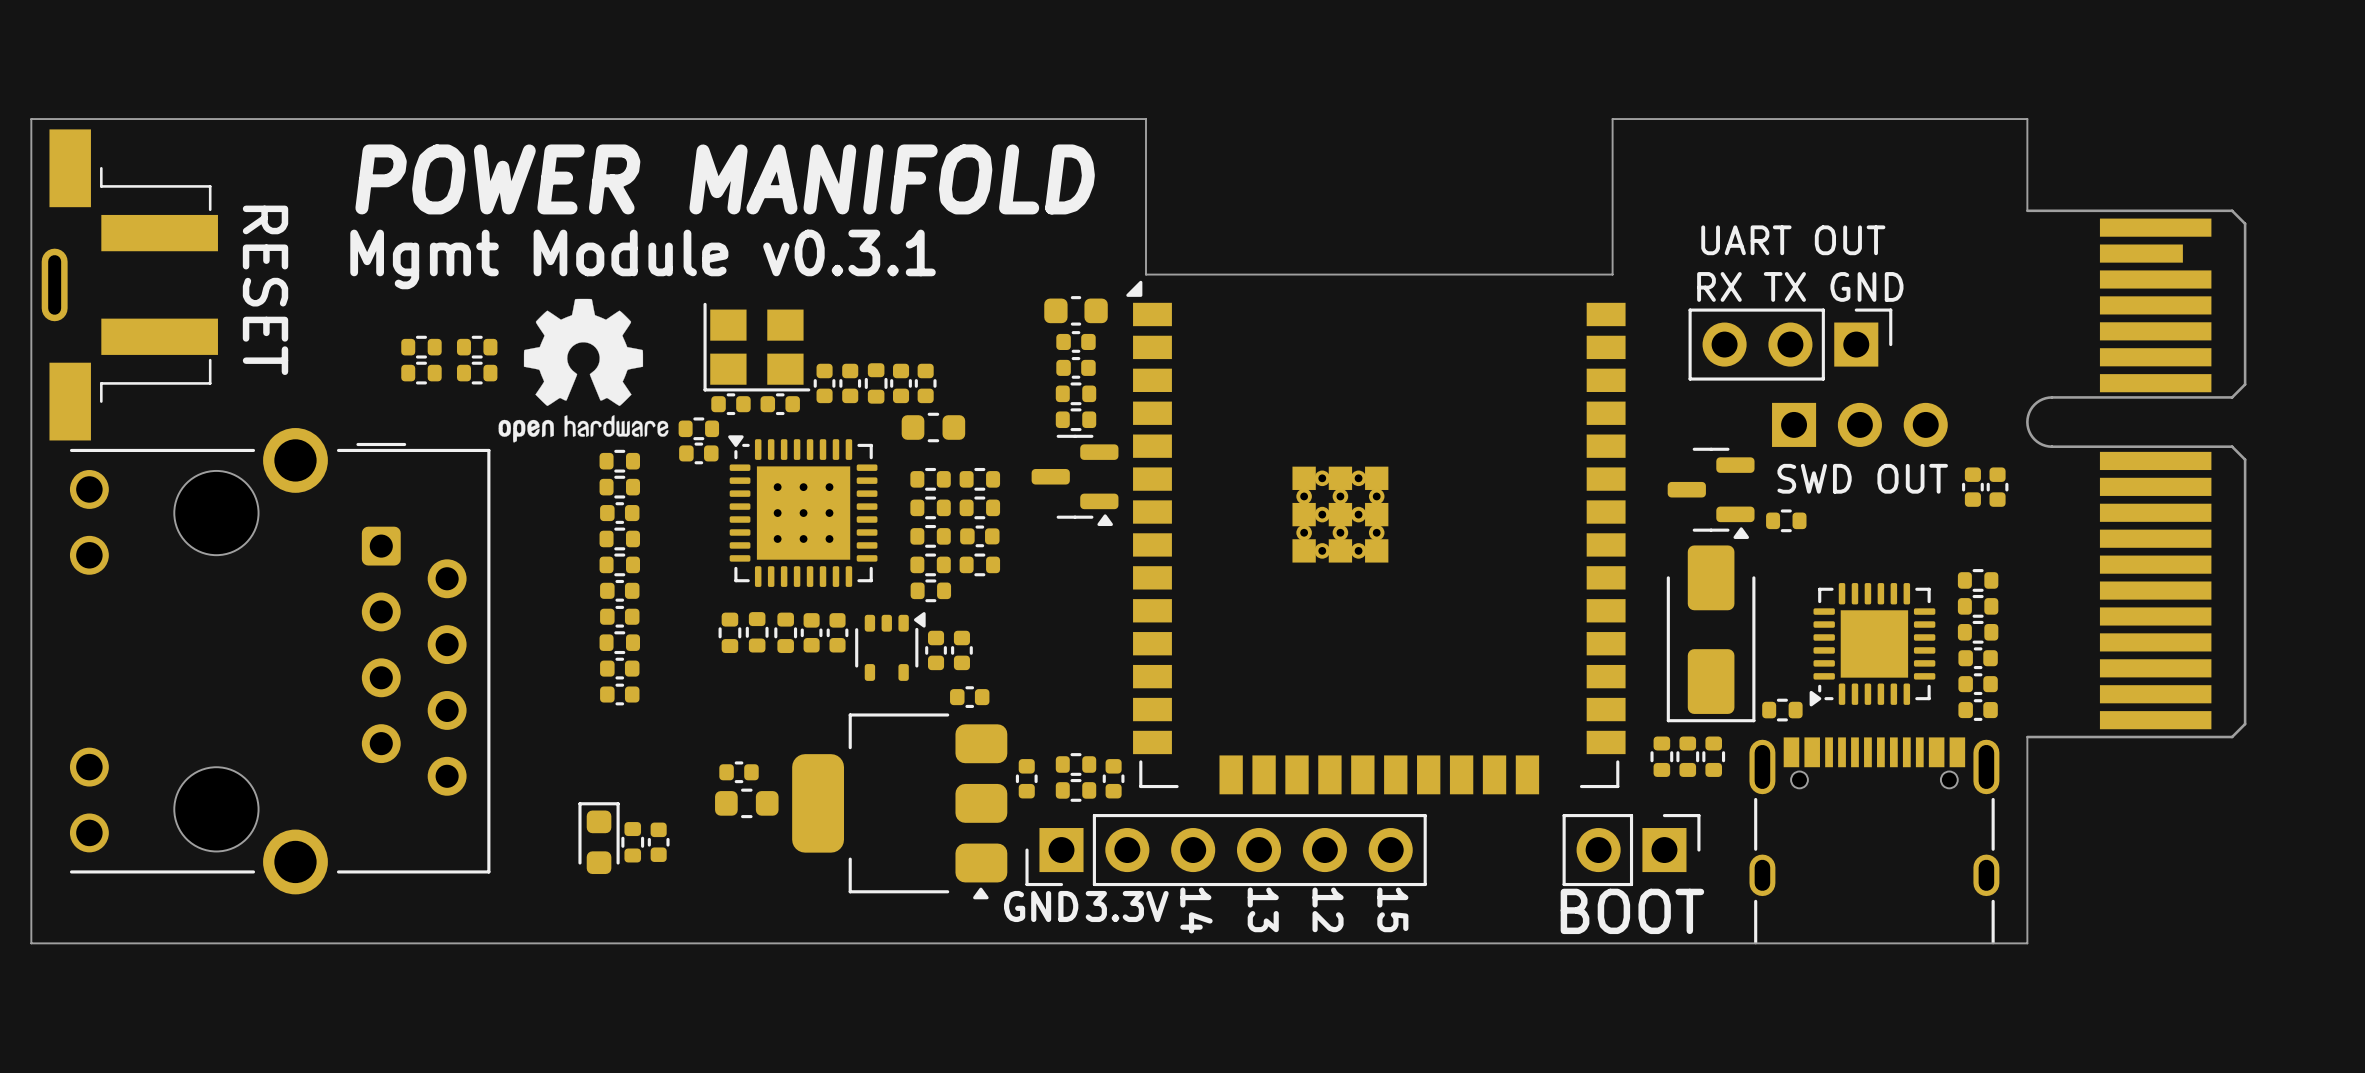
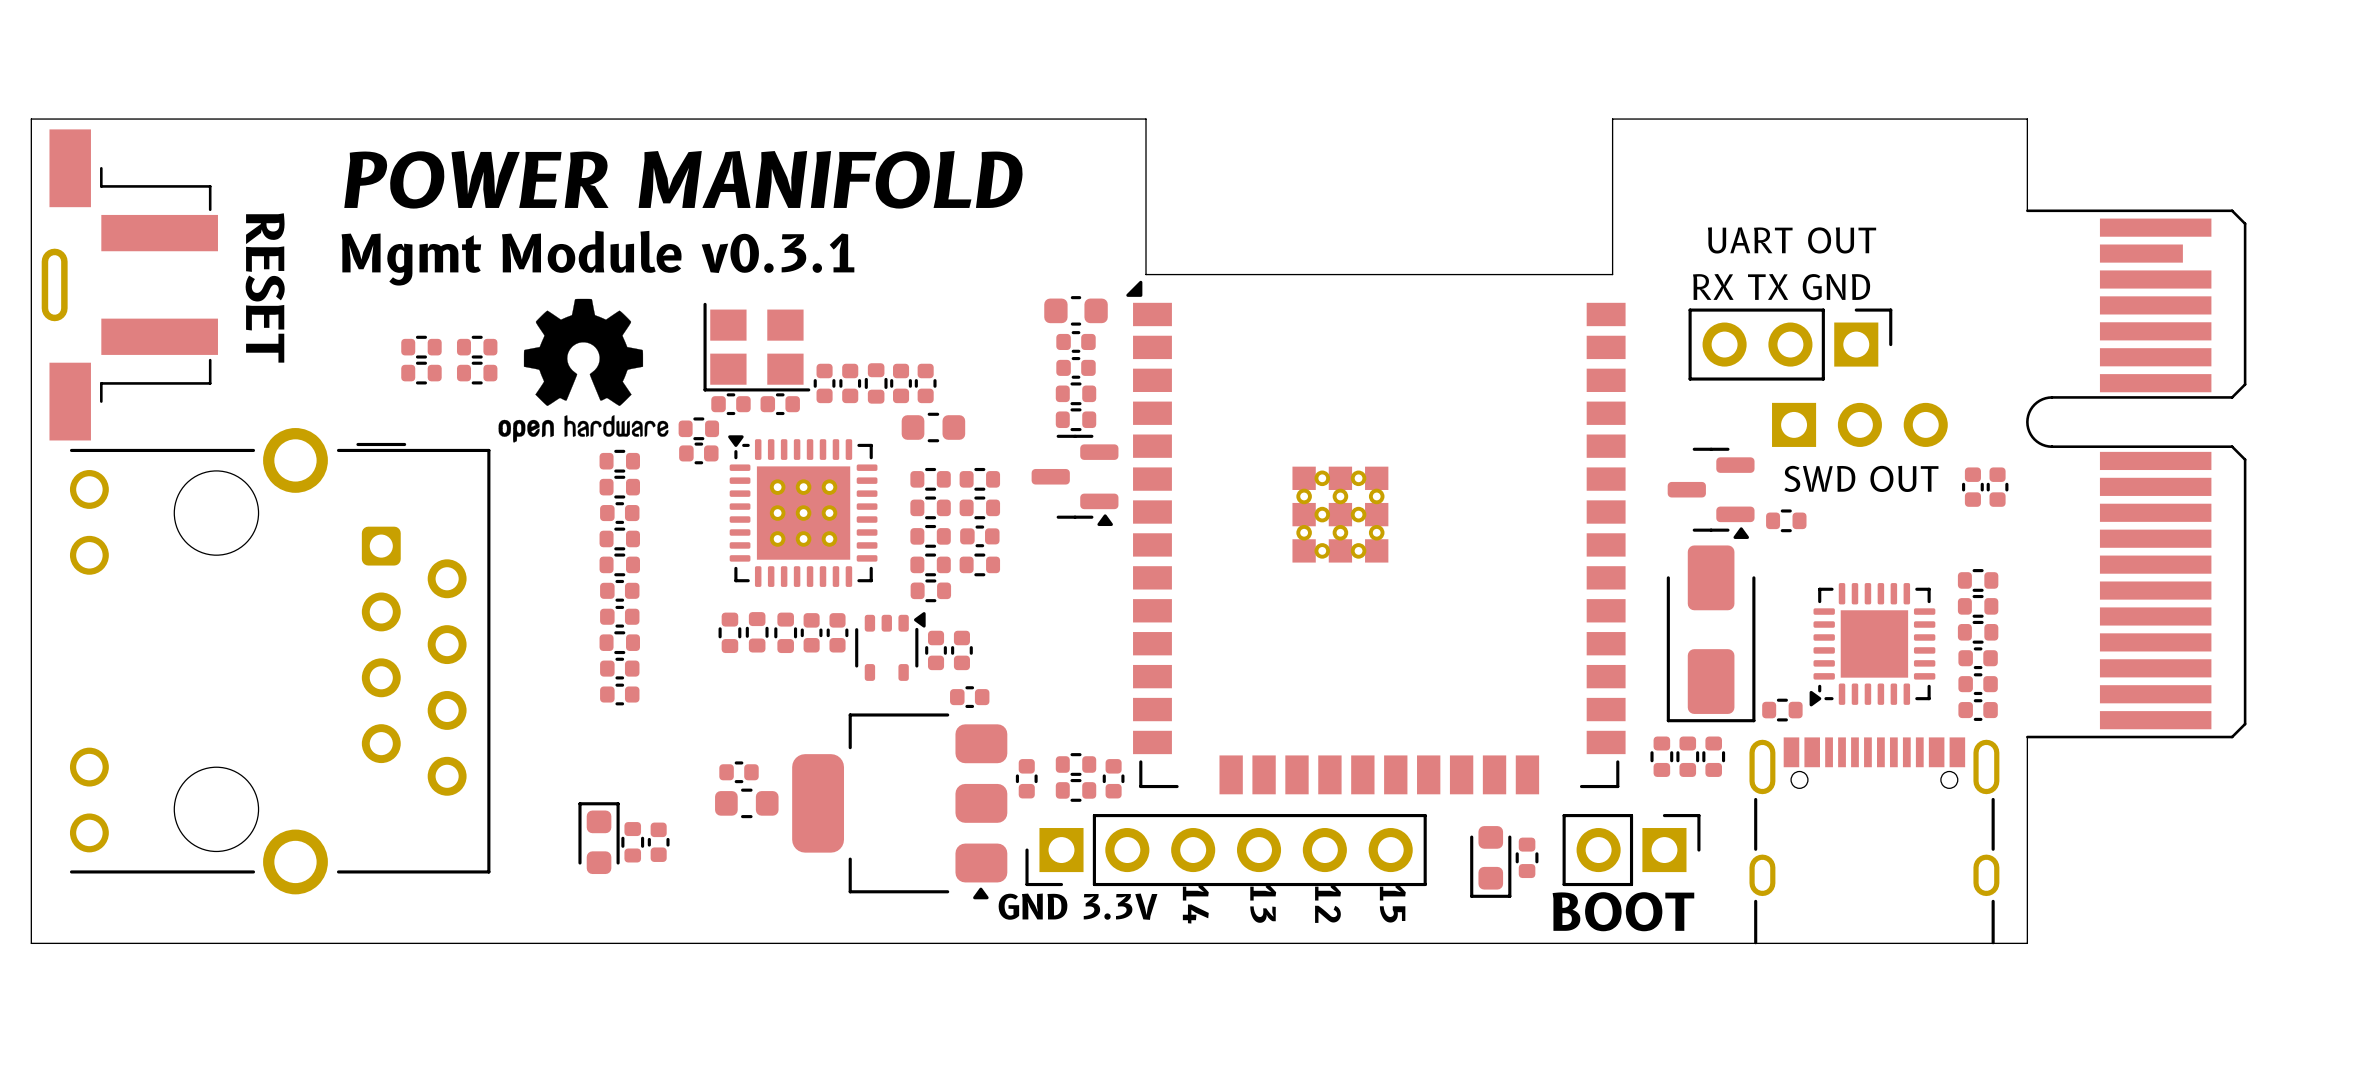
part: none -> (1527, 857)
part: none -> (1490, 861)

